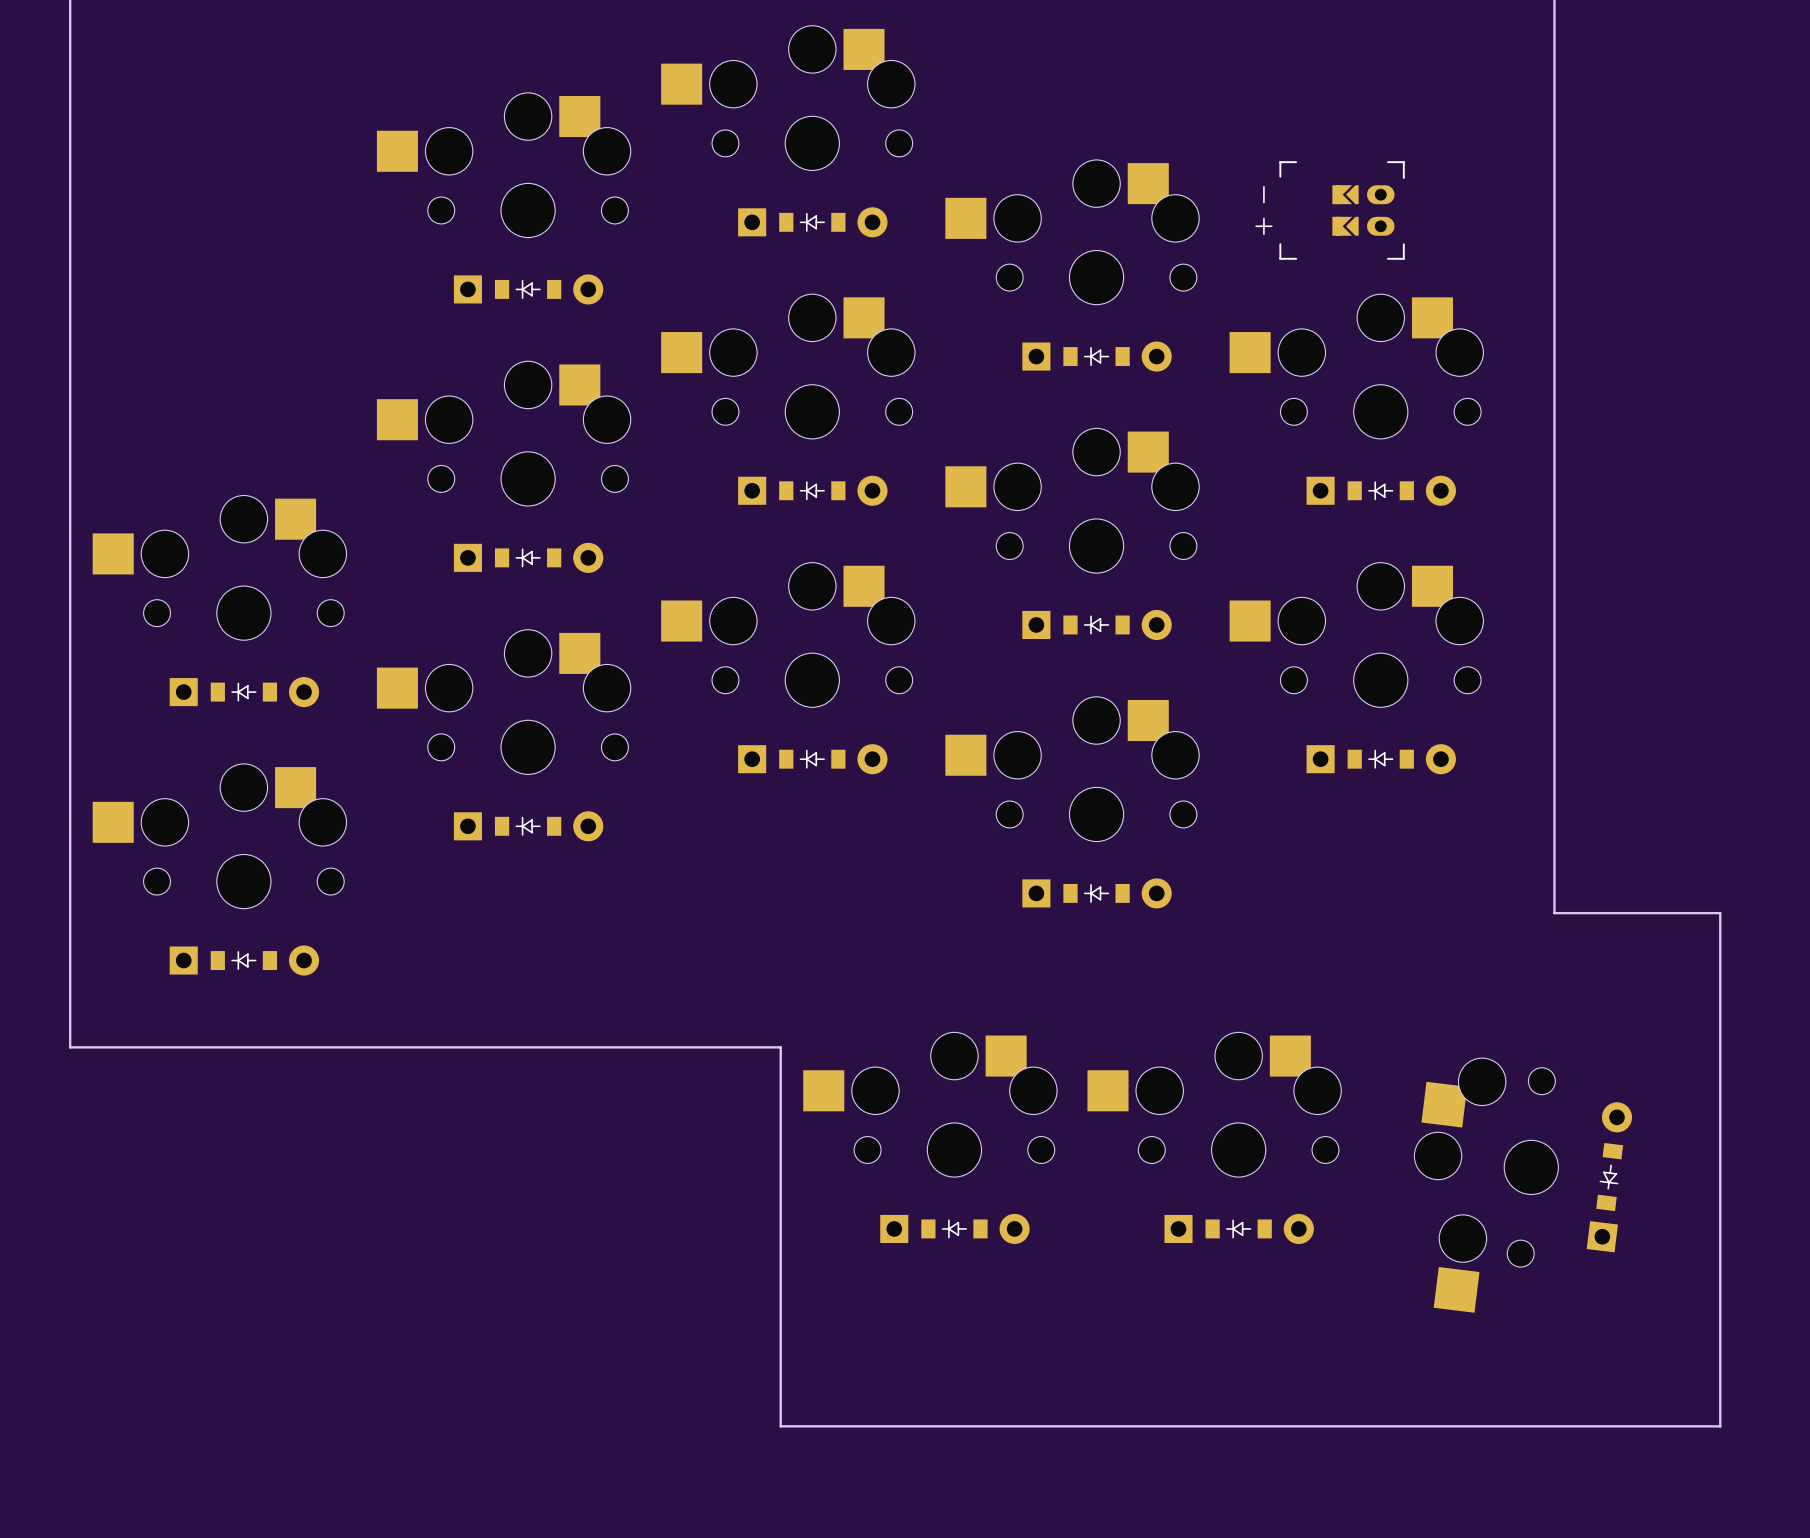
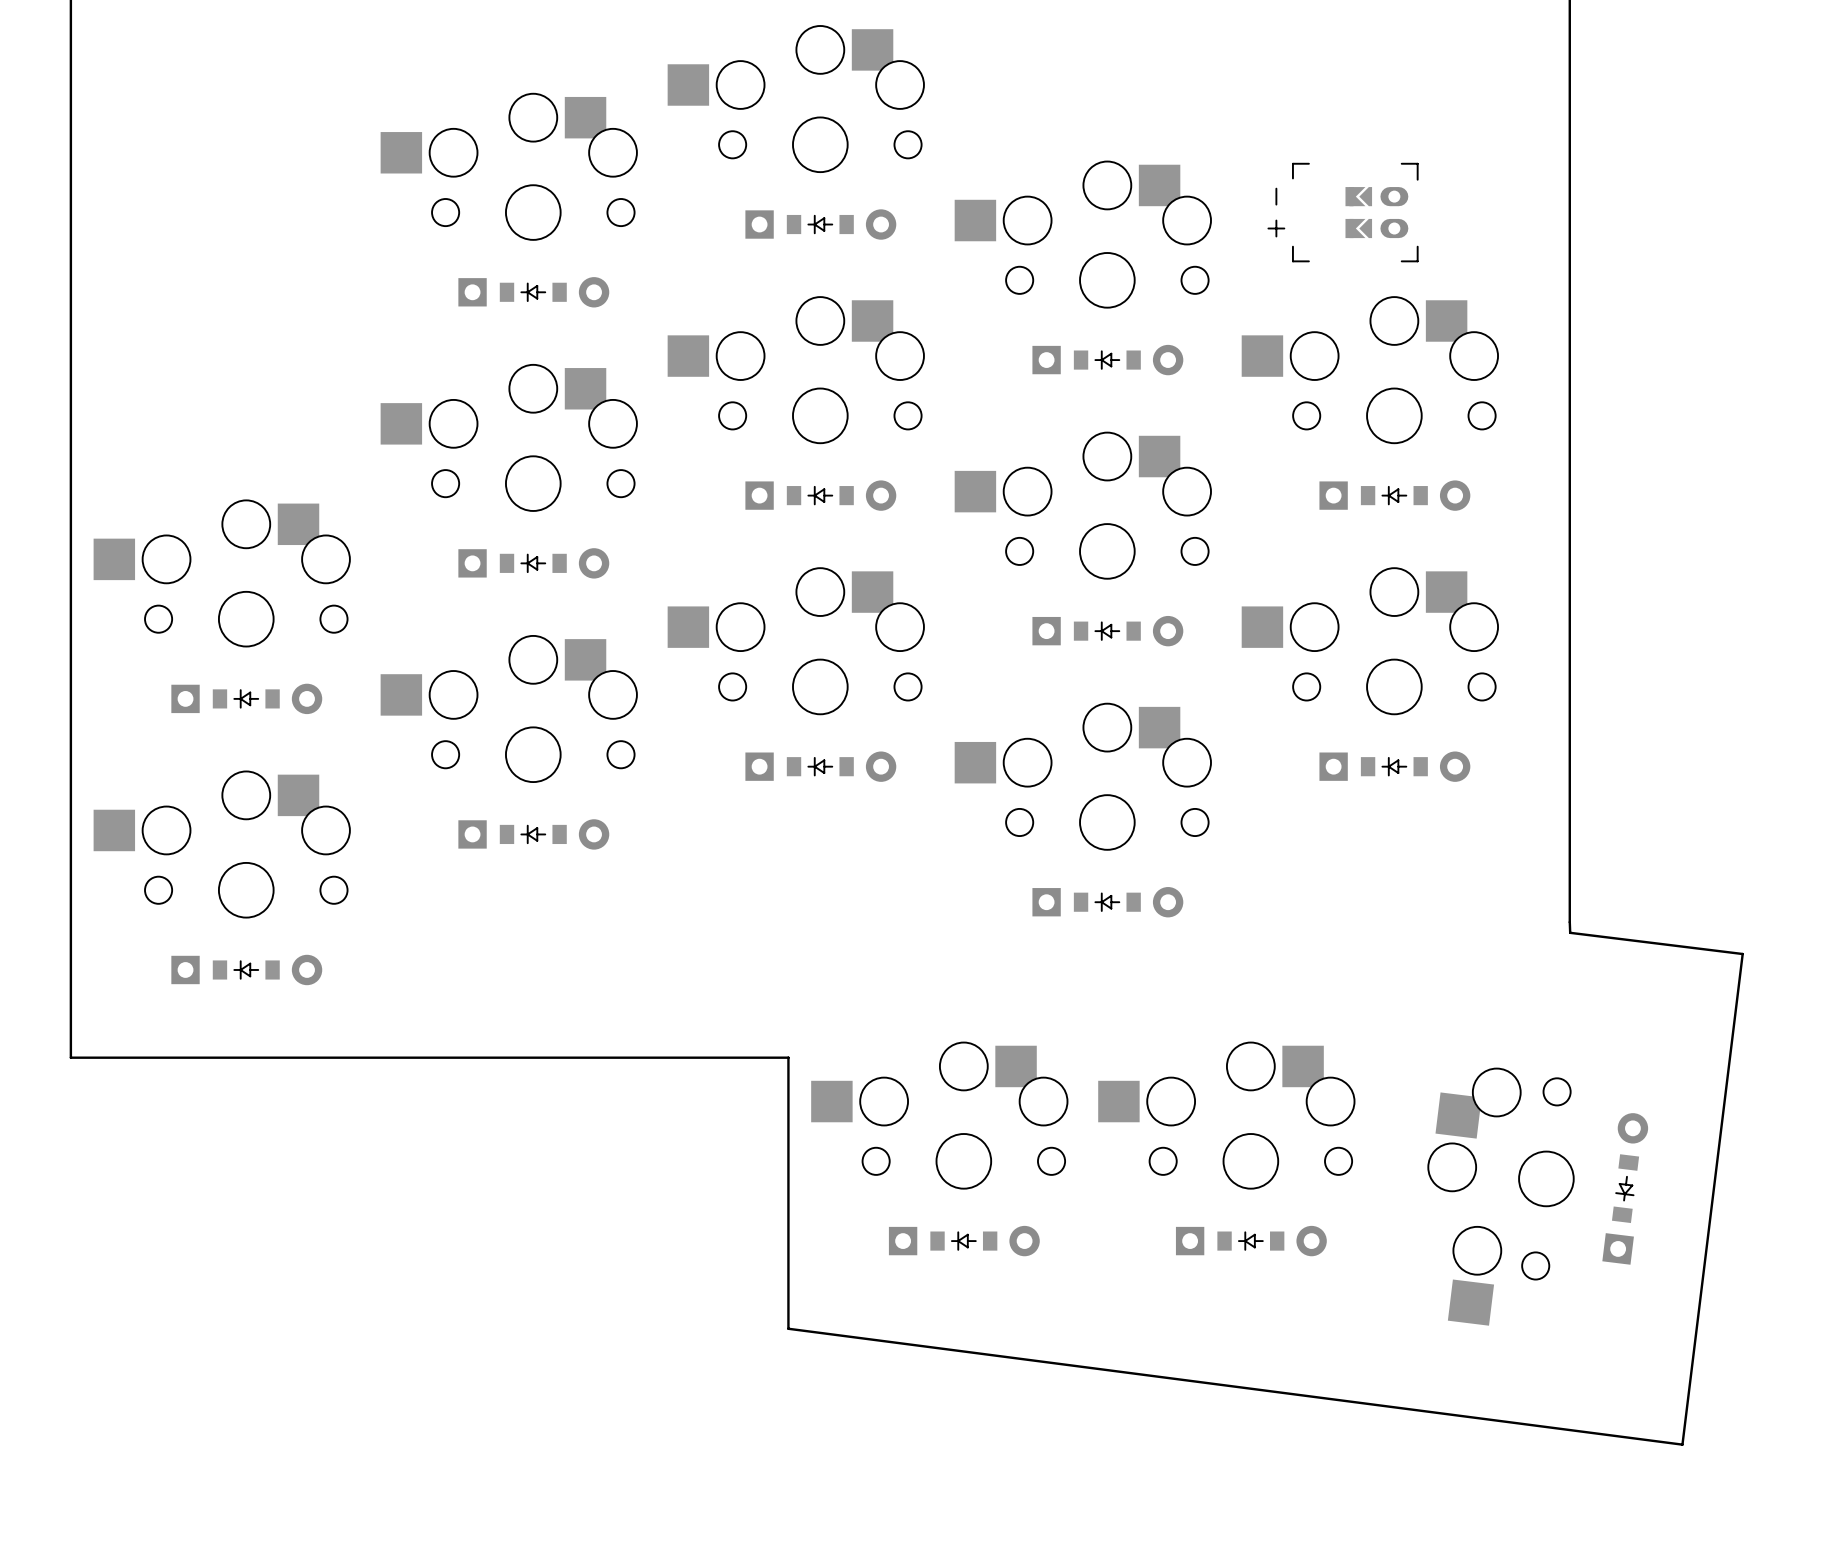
board edge: (1554, 913) (1720, 913) (1720, 1426) (780, 1426) (780, 1315) -> (1569, 922) (1570, 932) (1742, 954) (1682, 1444) (788, 1328)

